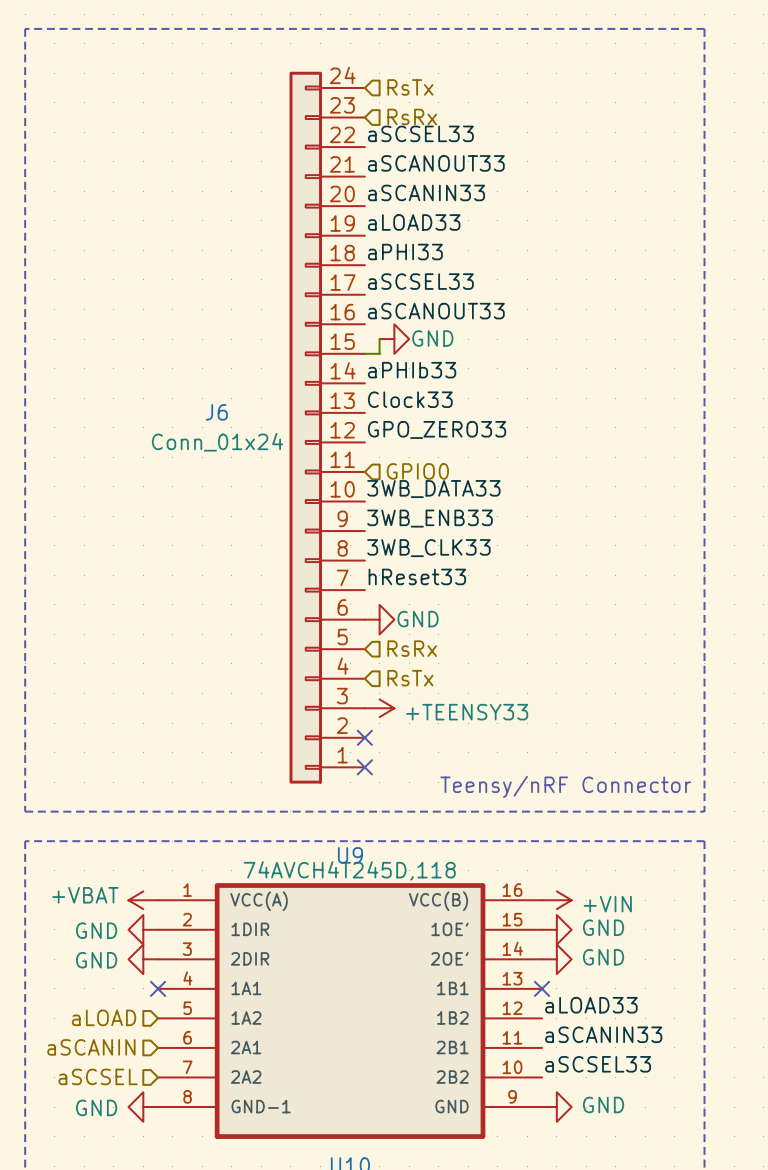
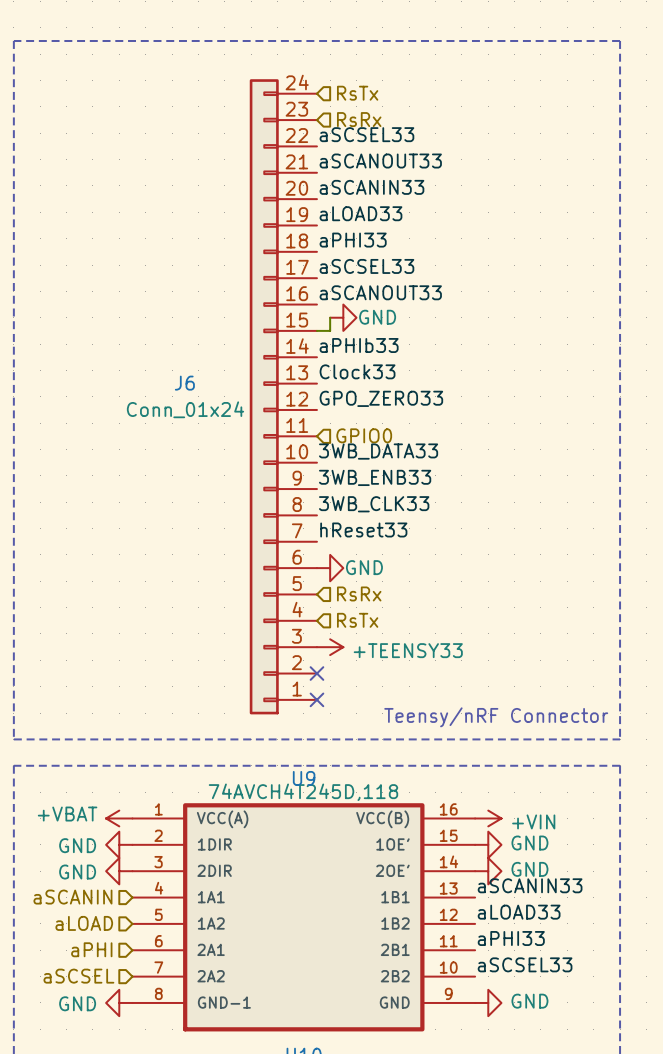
label: none -> aSCANIN33 (530, 885)
hierarchical label: none -> aSCANIN (72, 897)
no-connect mark: (158, 988) -> none
no-connect mark: (542, 988) -> none
label: aSCANIN33 (603, 1034) -> aPHI33 (511, 938)
hierarchical label: aSCANIN (91, 1047) -> aPHI (91, 949)

